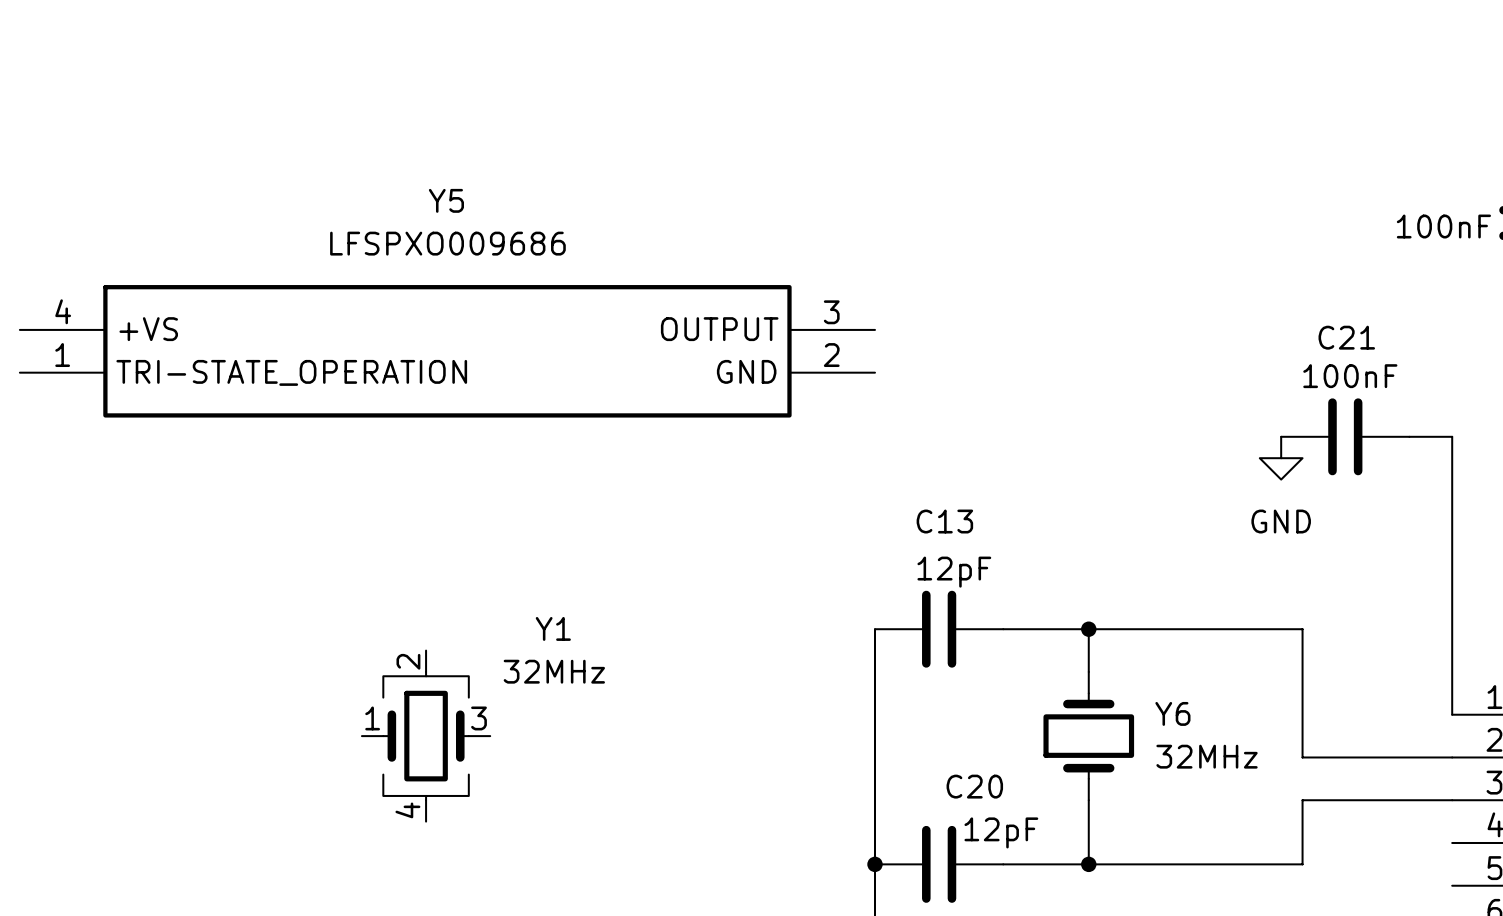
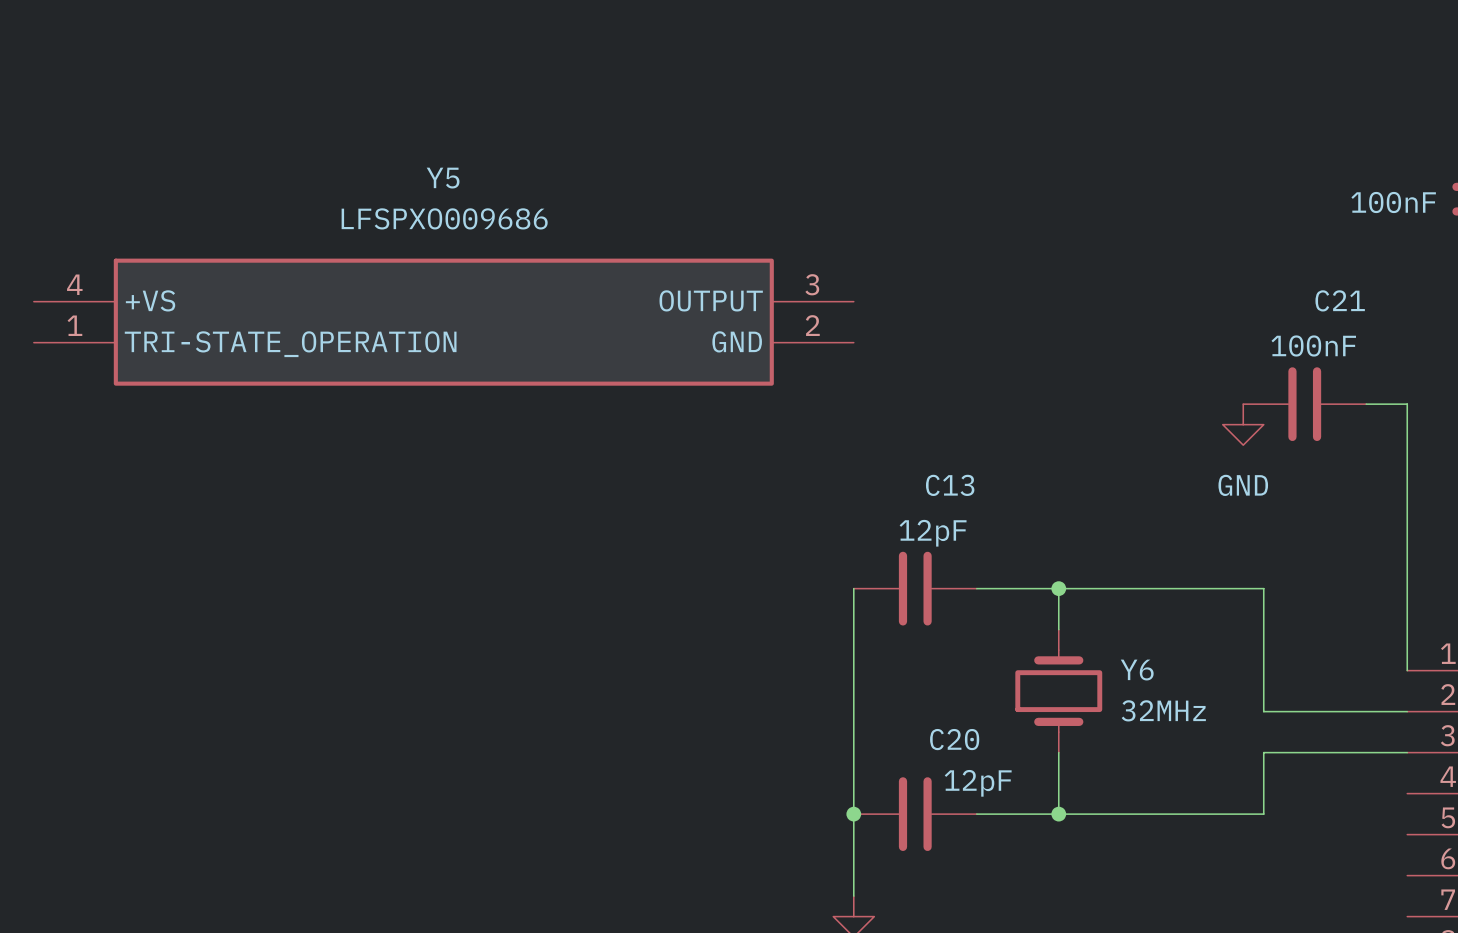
C21 name position: C21 (1346, 337) -> C21 (1340, 300)
C13 name position: C13 (944, 521) -> C13 (950, 485)
Y1: 32MHz (426, 736) -> none

